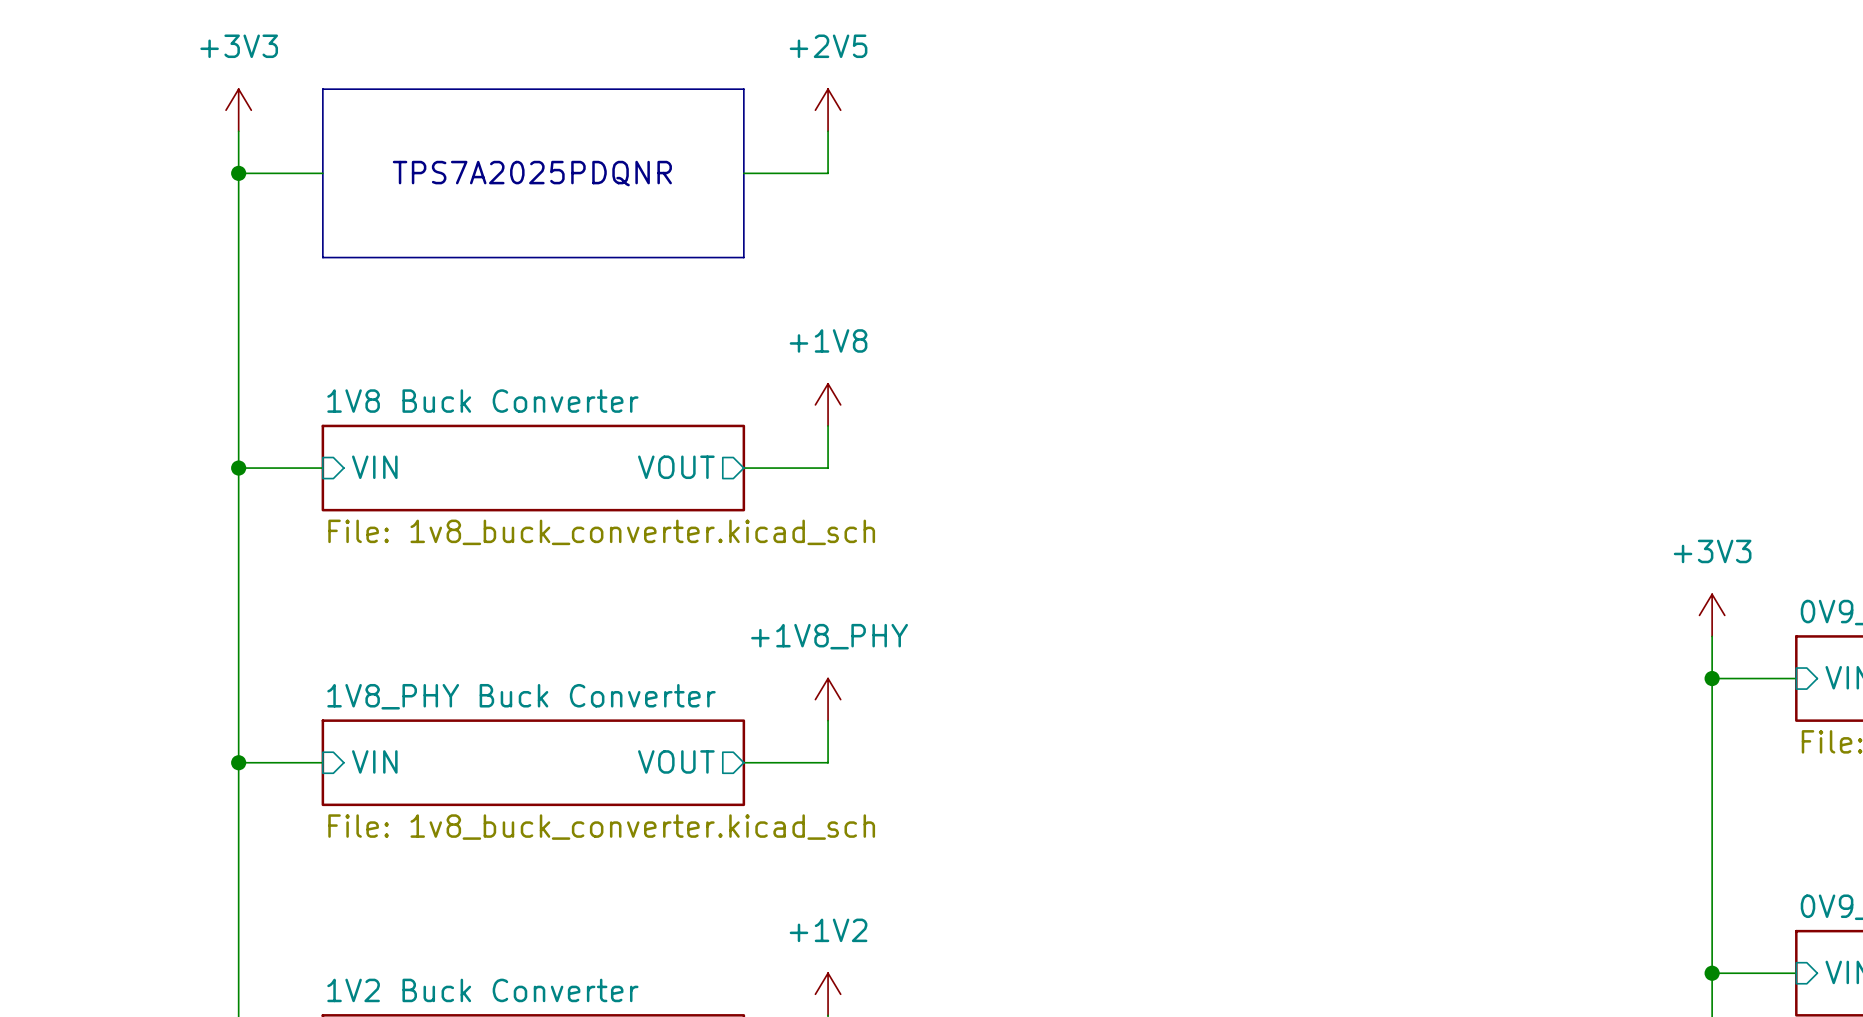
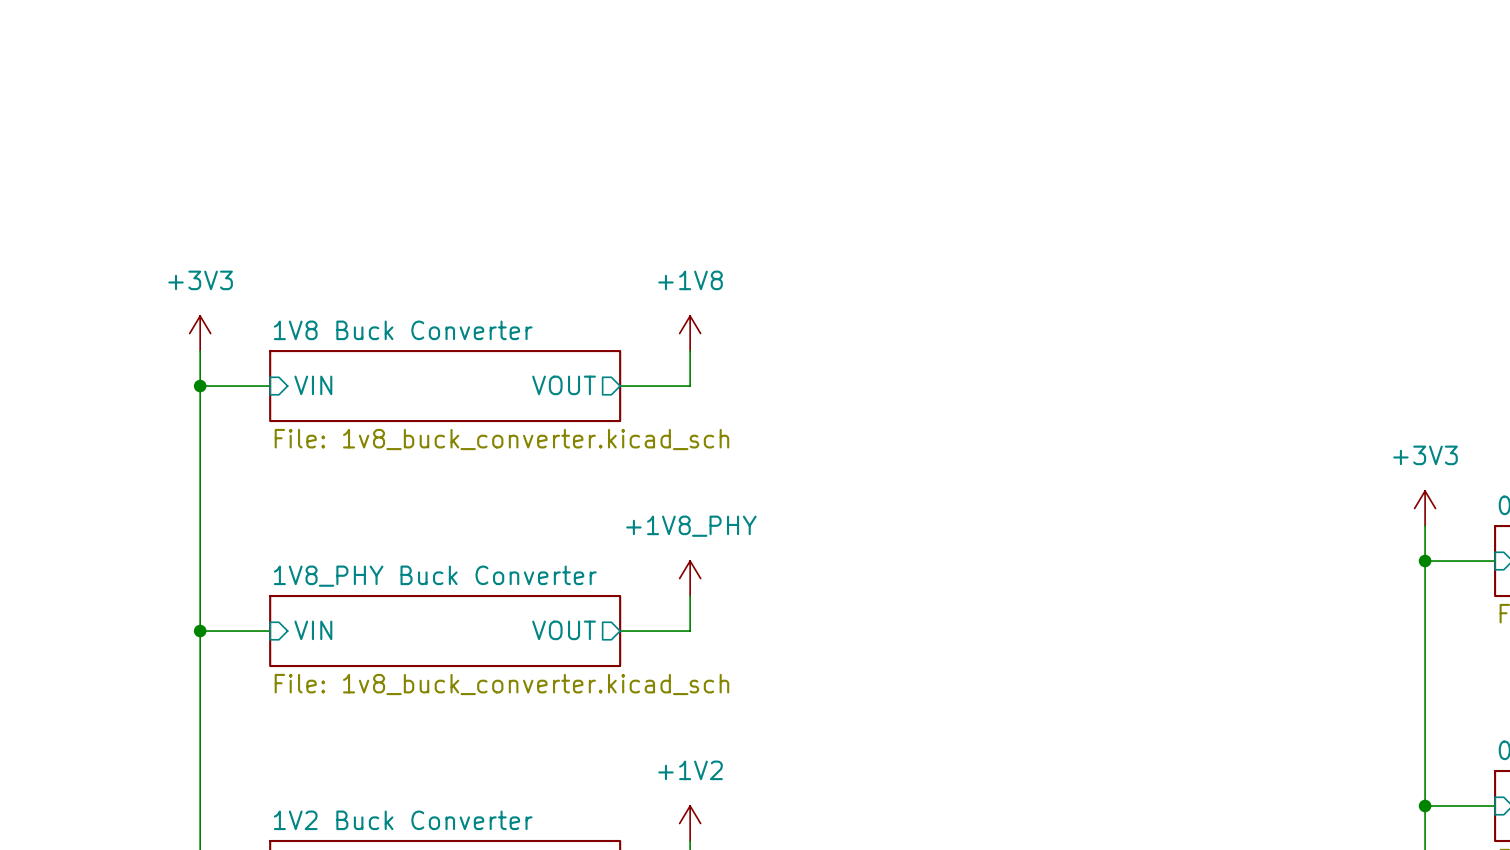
line: (322, 89) (743, 89) (743, 257) (322, 257) (322, 89) -> none
power symbol position: +3V3 (238, 110) -> +3V3 (200, 333)
power symbol: +2V5 (828, 110) -> none
wire: (238, 131) (238, 425) -> none
wire: (828, 131) (828, 173) (743, 173) -> none
wire: (238, 173) (322, 173) -> none
junction: (238, 173) -> none
text: TPS7A2025PDQNR (532, 173) -> none

